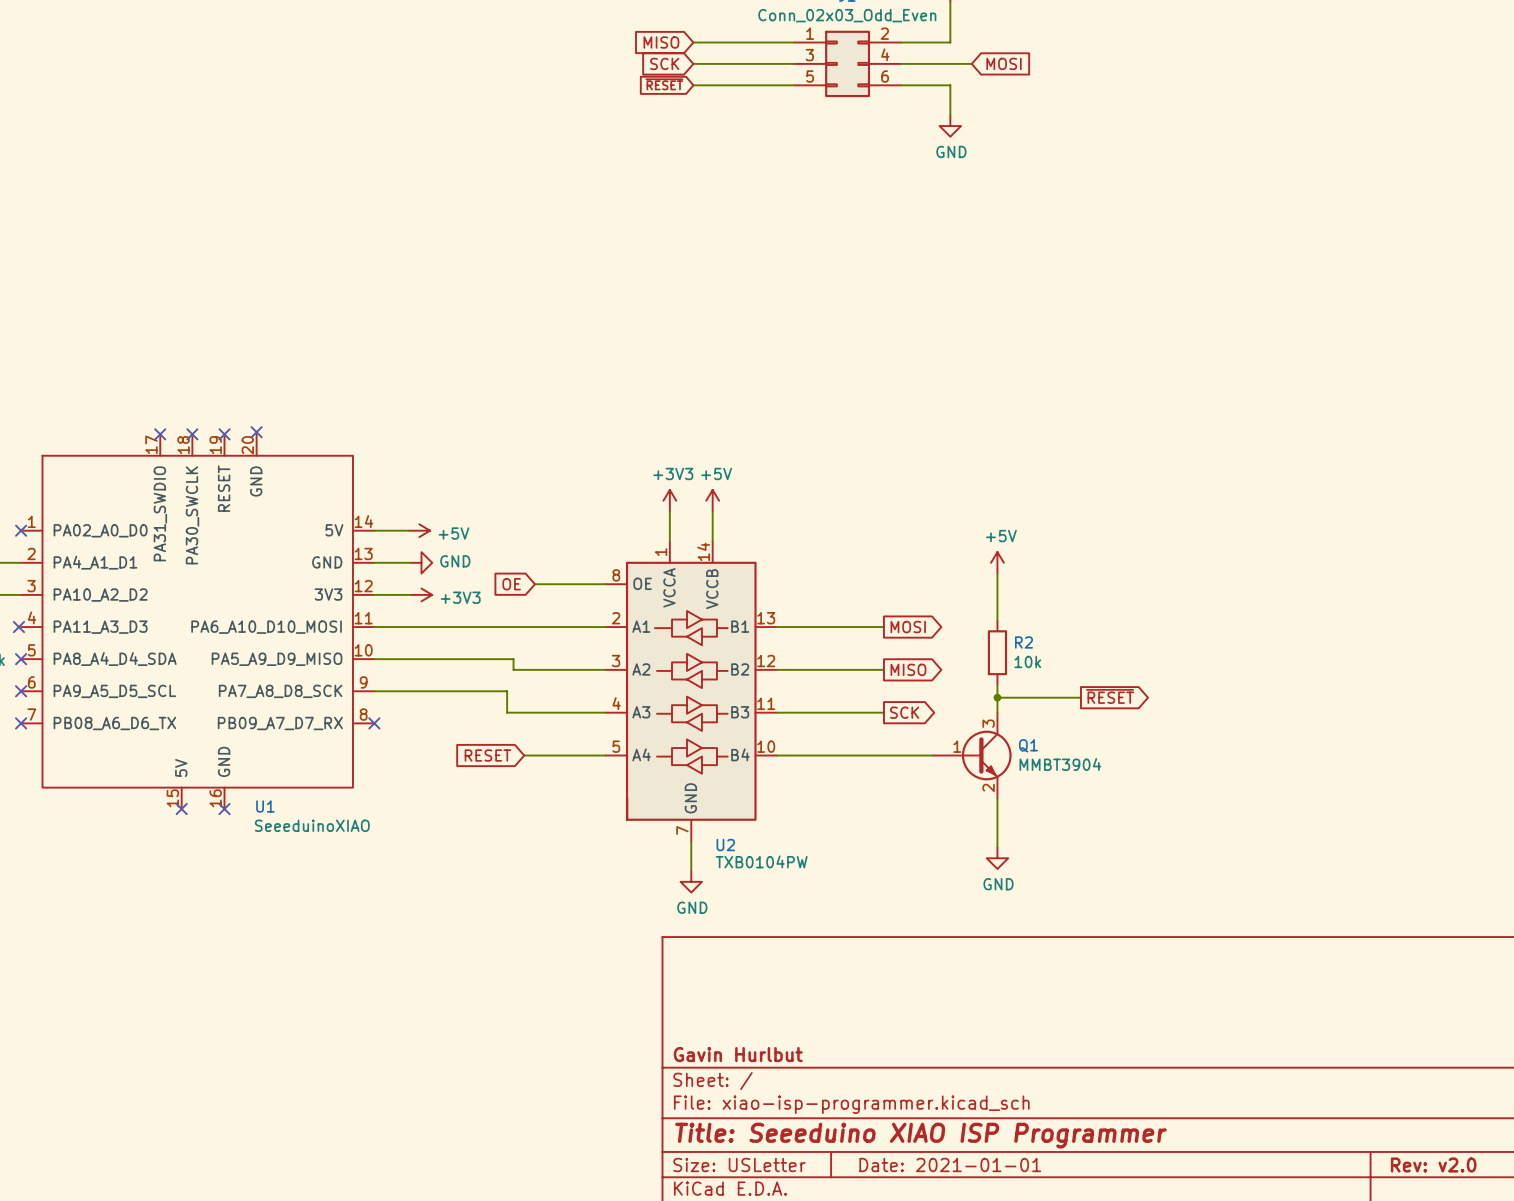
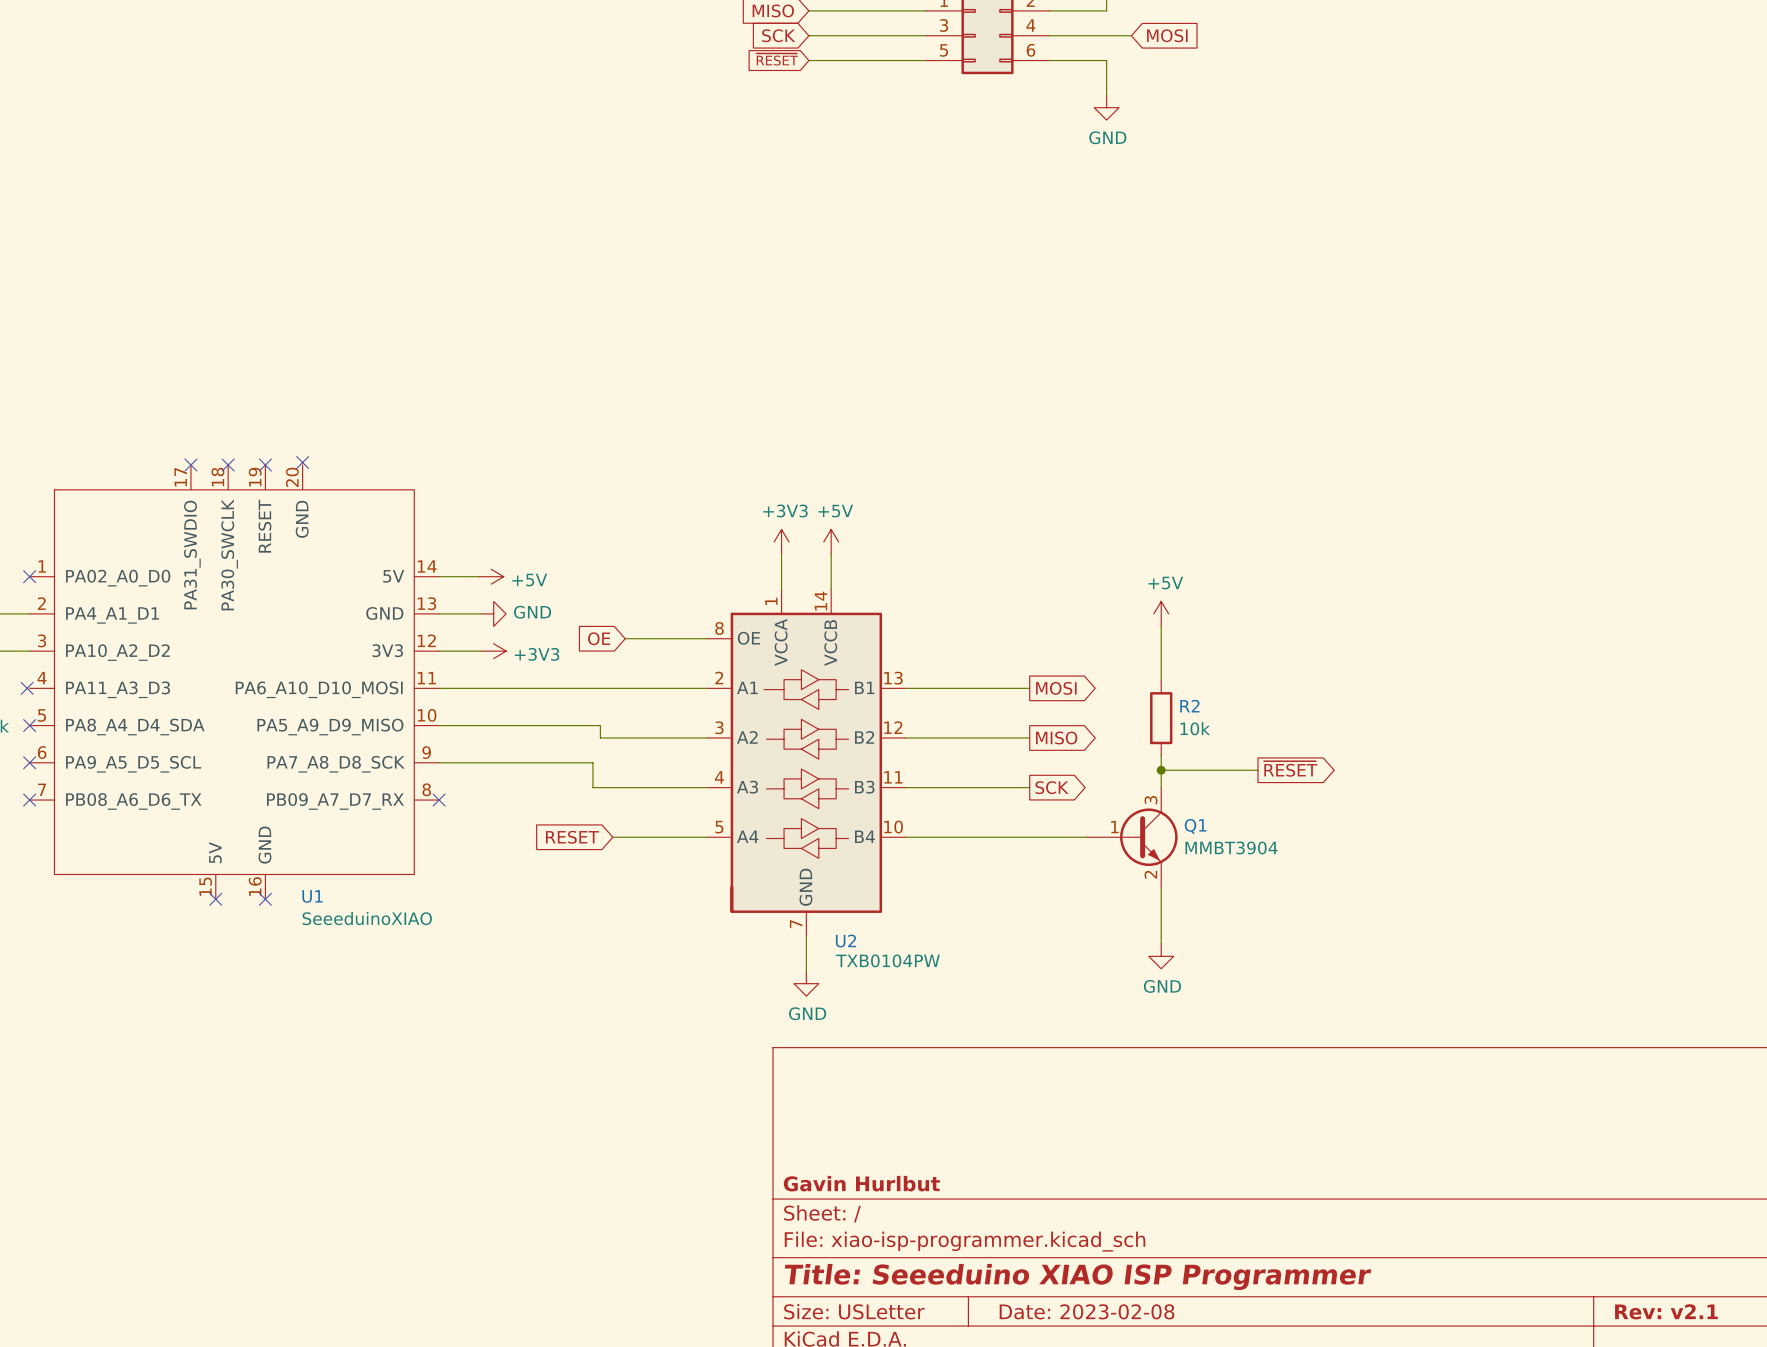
title block: Date: 2021-01-01 (950, 1164) -> Date: 2023-02-08 (1087, 1311)
title block: Rev: v2.0 (1433, 1164) -> Rev: v2.1 (1666, 1311)

